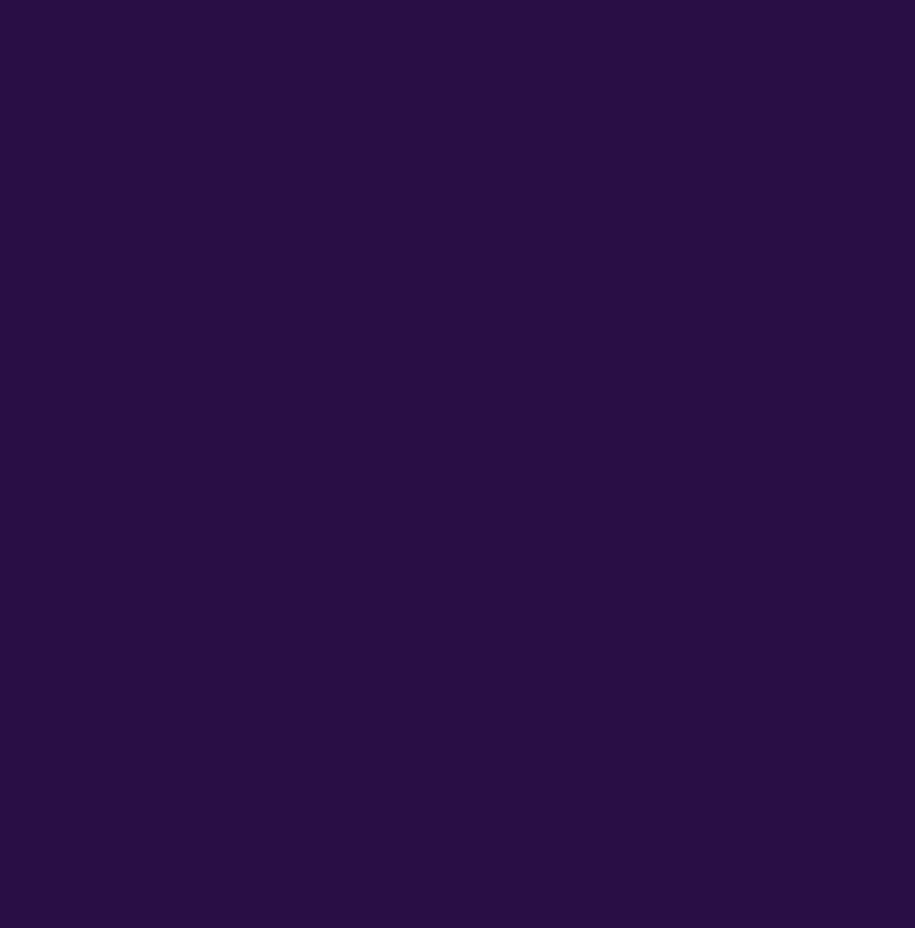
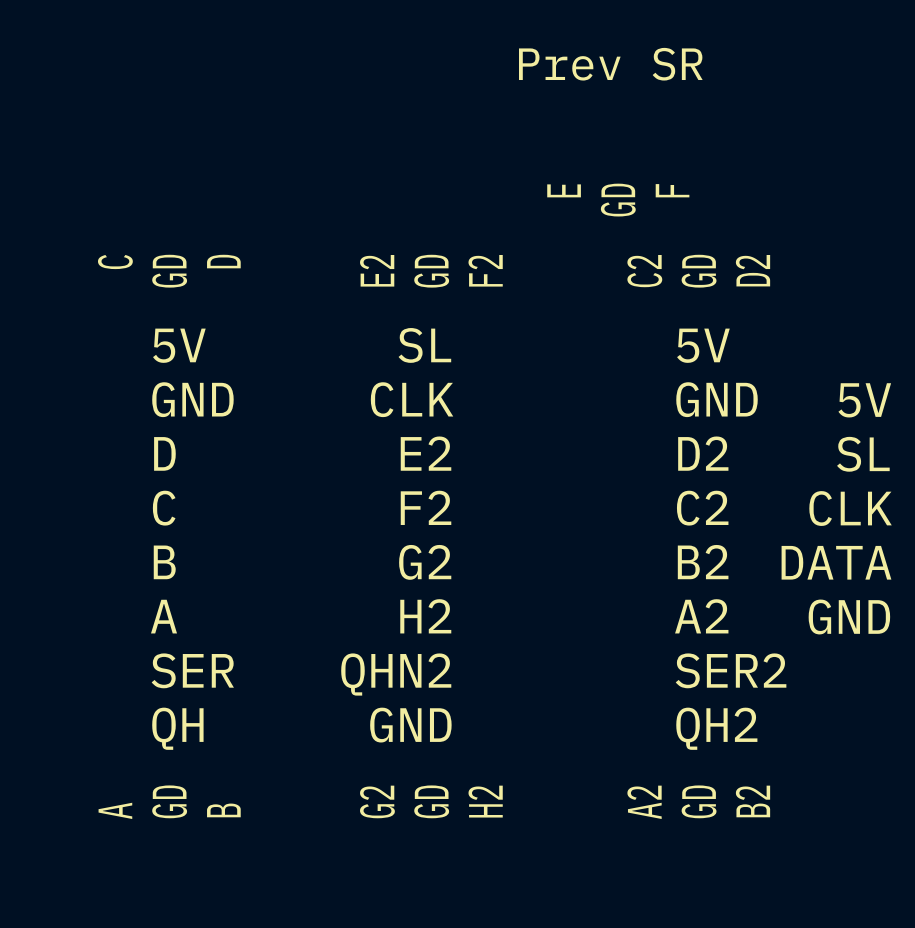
text: none -> Prev SR (610, 64)
text: none -> F (672, 190)
text: none -> E (564, 190)
text: none -> GD (618, 200)
text: none -> C (115, 262)
text: none -> D (223, 261)
text: none -> F2 (485, 270)
text: none -> E2 (377, 270)
text: none -> C2 (644, 271)
text: none -> D2 (753, 270)
text: none -> GD (169, 271)
text: none -> GD (431, 271)
text: none -> GD (699, 271)
text: none -> 5V (179, 345)
text: none -> SL (424, 345)
text: none -> 5V (703, 345)
text: none -> GND (192, 399)
text: none -> CLK (412, 399)
text: none -> GND (717, 399)
text: none -> 5V (864, 400)
text: none -> D (164, 453)
text: none -> E2 (426, 453)
text: none -> D2 (703, 453)
text: none -> SL (863, 454)
text: none -> C (164, 508)
text: none -> F2 (426, 507)
text: none -> C2 (702, 508)
text: none -> CLK (850, 508)
text: none -> B (164, 562)
text: none -> G2 (425, 562)
text: none -> B2 (703, 562)
text: none -> DATA (836, 562)
text: none -> A (164, 616)
text: none -> H2 (425, 616)
text: none -> A2 (701, 616)
text: none -> GND (849, 616)
text: none -> SER (192, 670)
text: none -> SER2 (731, 670)
text: none -> QHN2 (396, 674)
text: none -> GND (410, 725)
text: none -> QH (177, 728)
text: none -> QH2 (716, 728)
text: none -> GD (169, 801)
text: none -> GD (431, 801)
text: none -> H2 (485, 801)
text: none -> GD (699, 801)
text: none -> B2 (753, 801)
text: none -> G2 (377, 801)
text: none -> A2 (644, 802)
text: none -> B (223, 810)
text: none -> A (115, 810)

